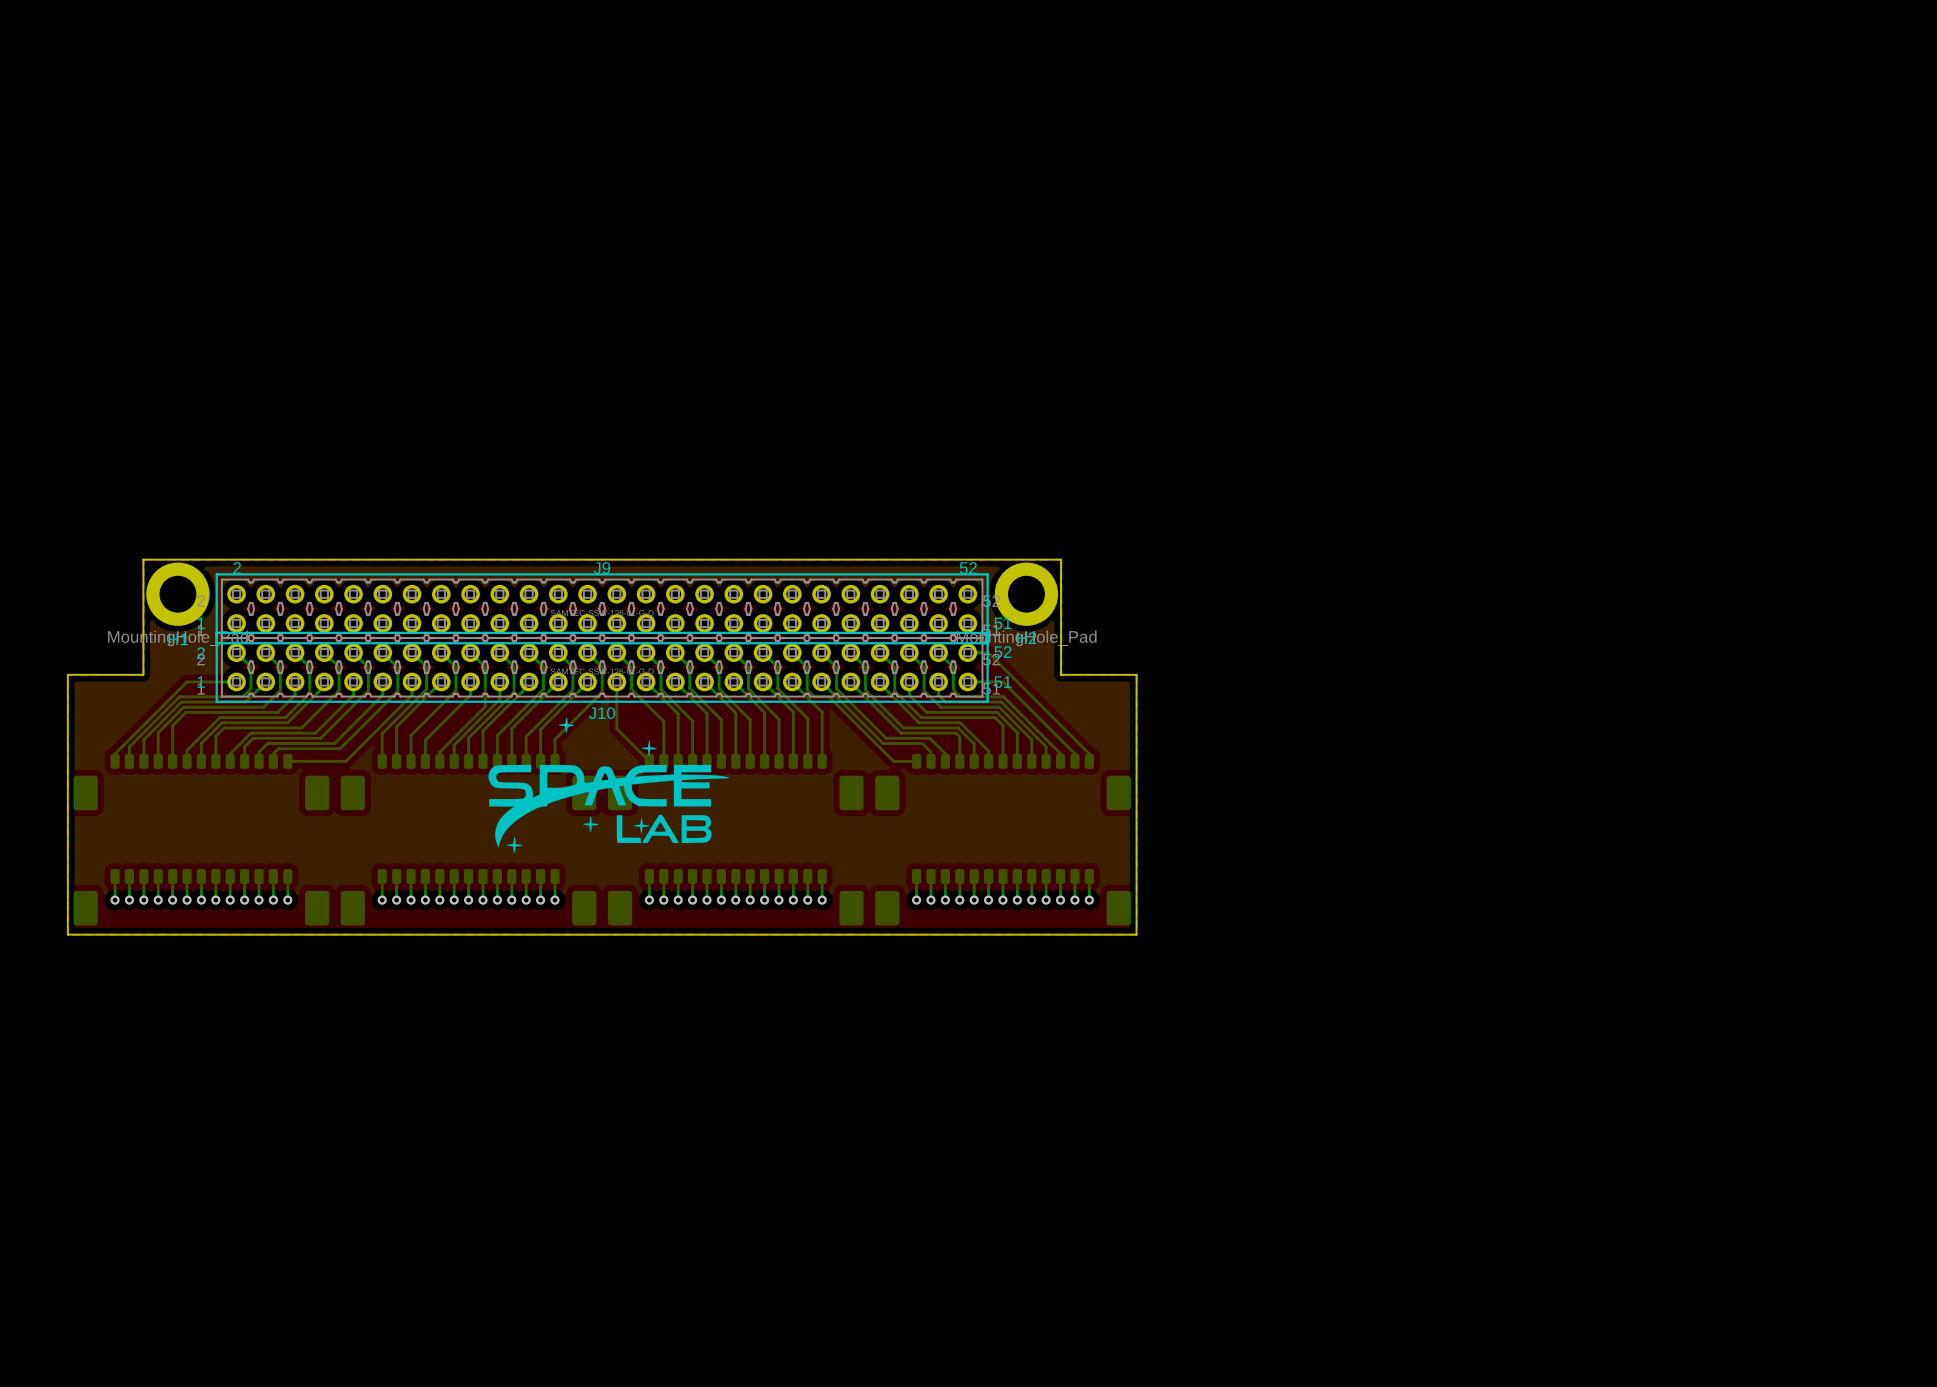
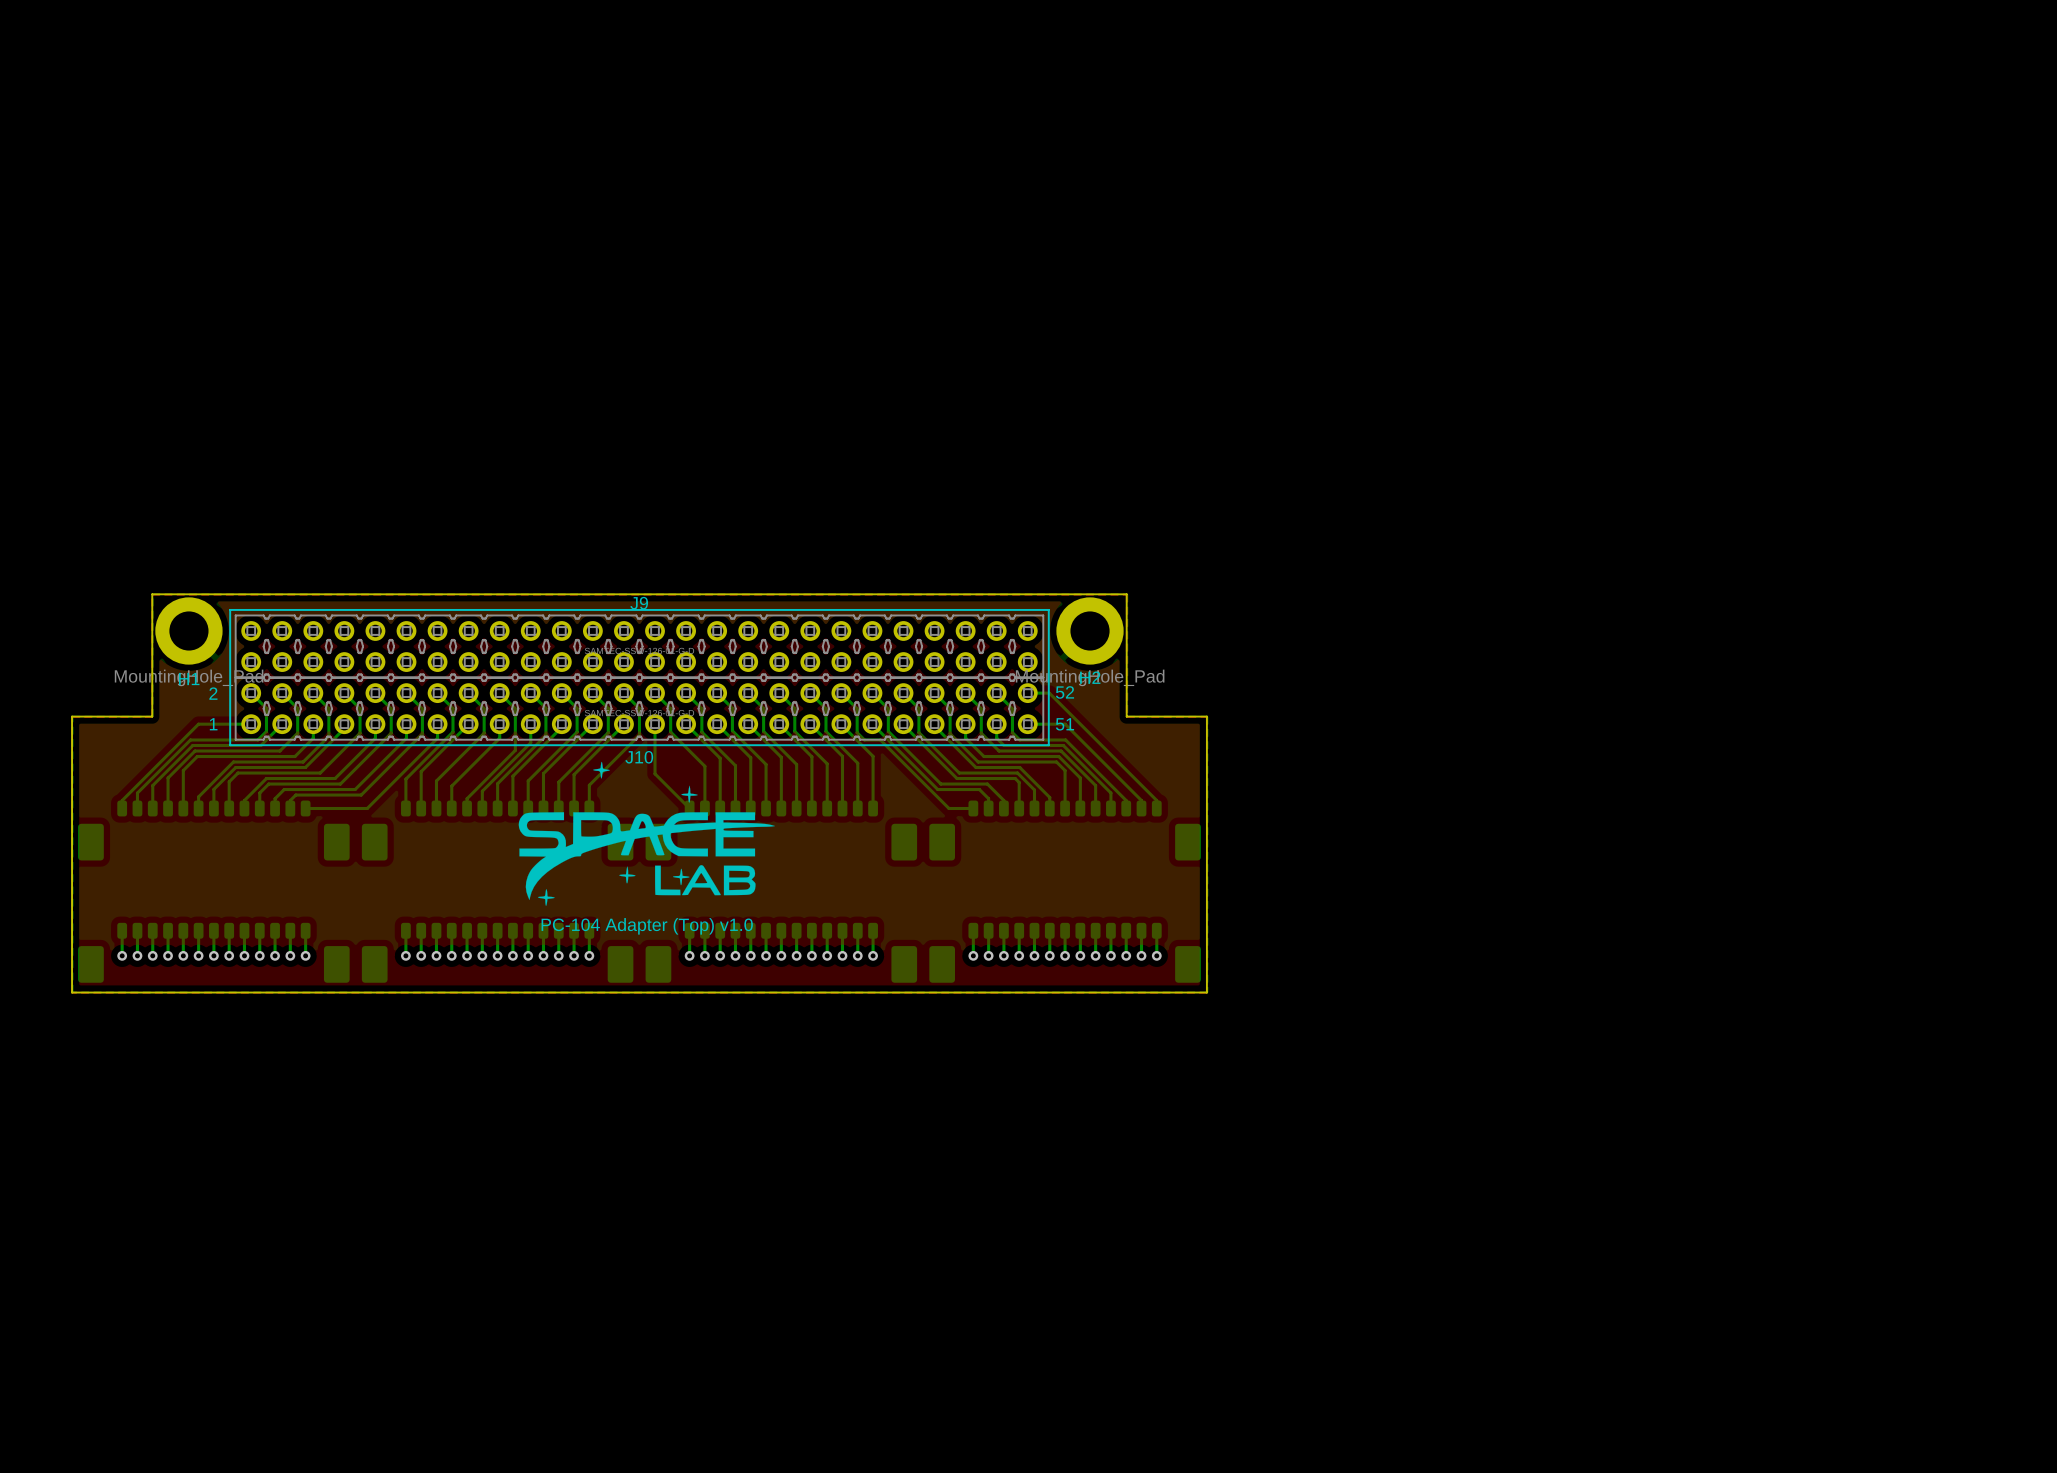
J9 footprint: [215, 573, 989, 645] -> [235, 614, 1044, 679]
line: none -> (230, 609) (1048, 609) (1048, 745) (230, 745) (230, 609)
J10 footprint: [215, 631, 989, 703] -> [235, 676, 1044, 741]
text: none -> PC-104 Adapter (Top) v1.0 (647, 926)

